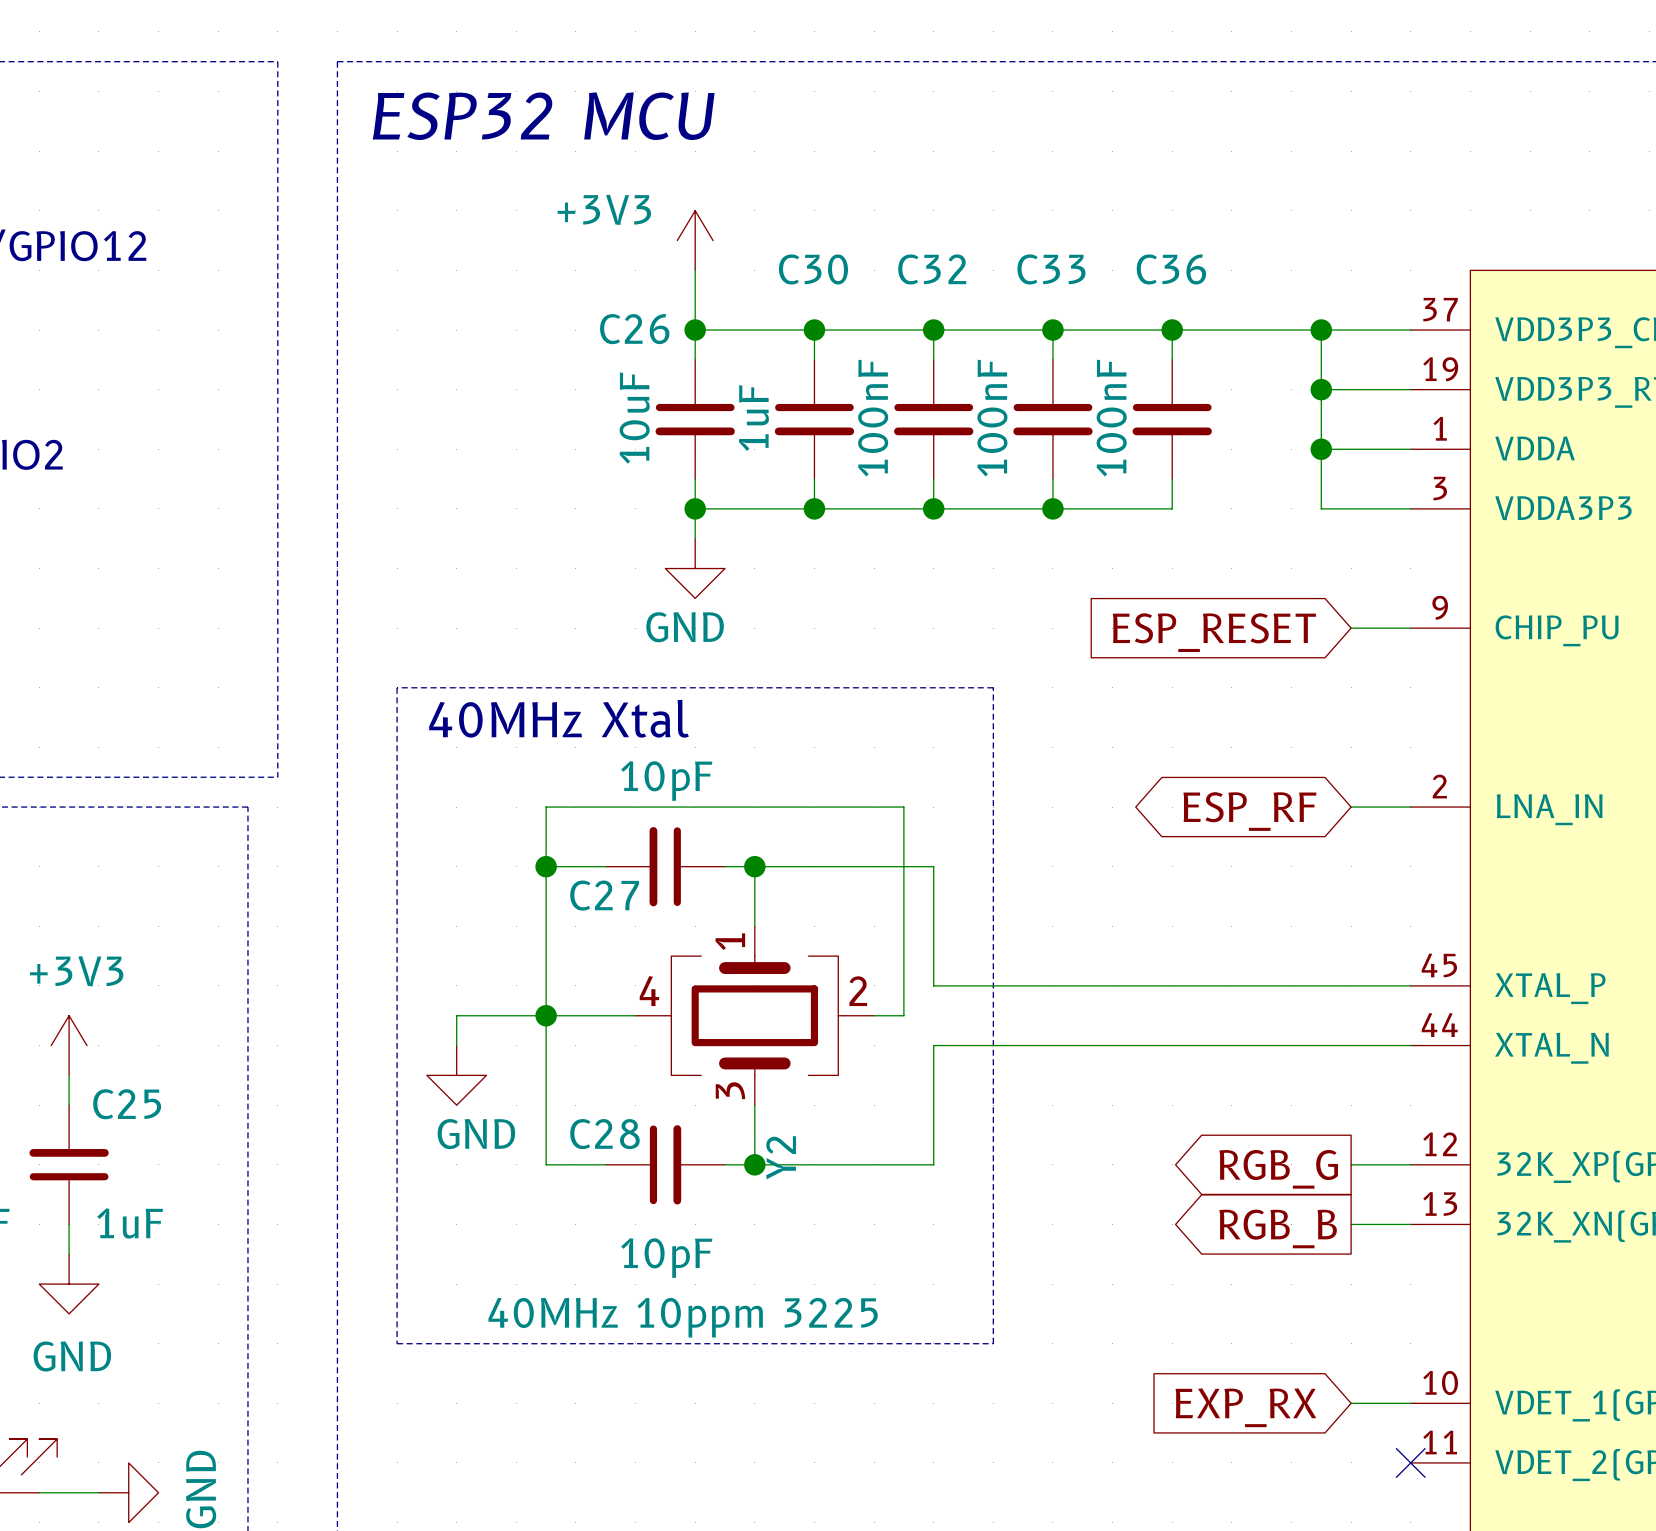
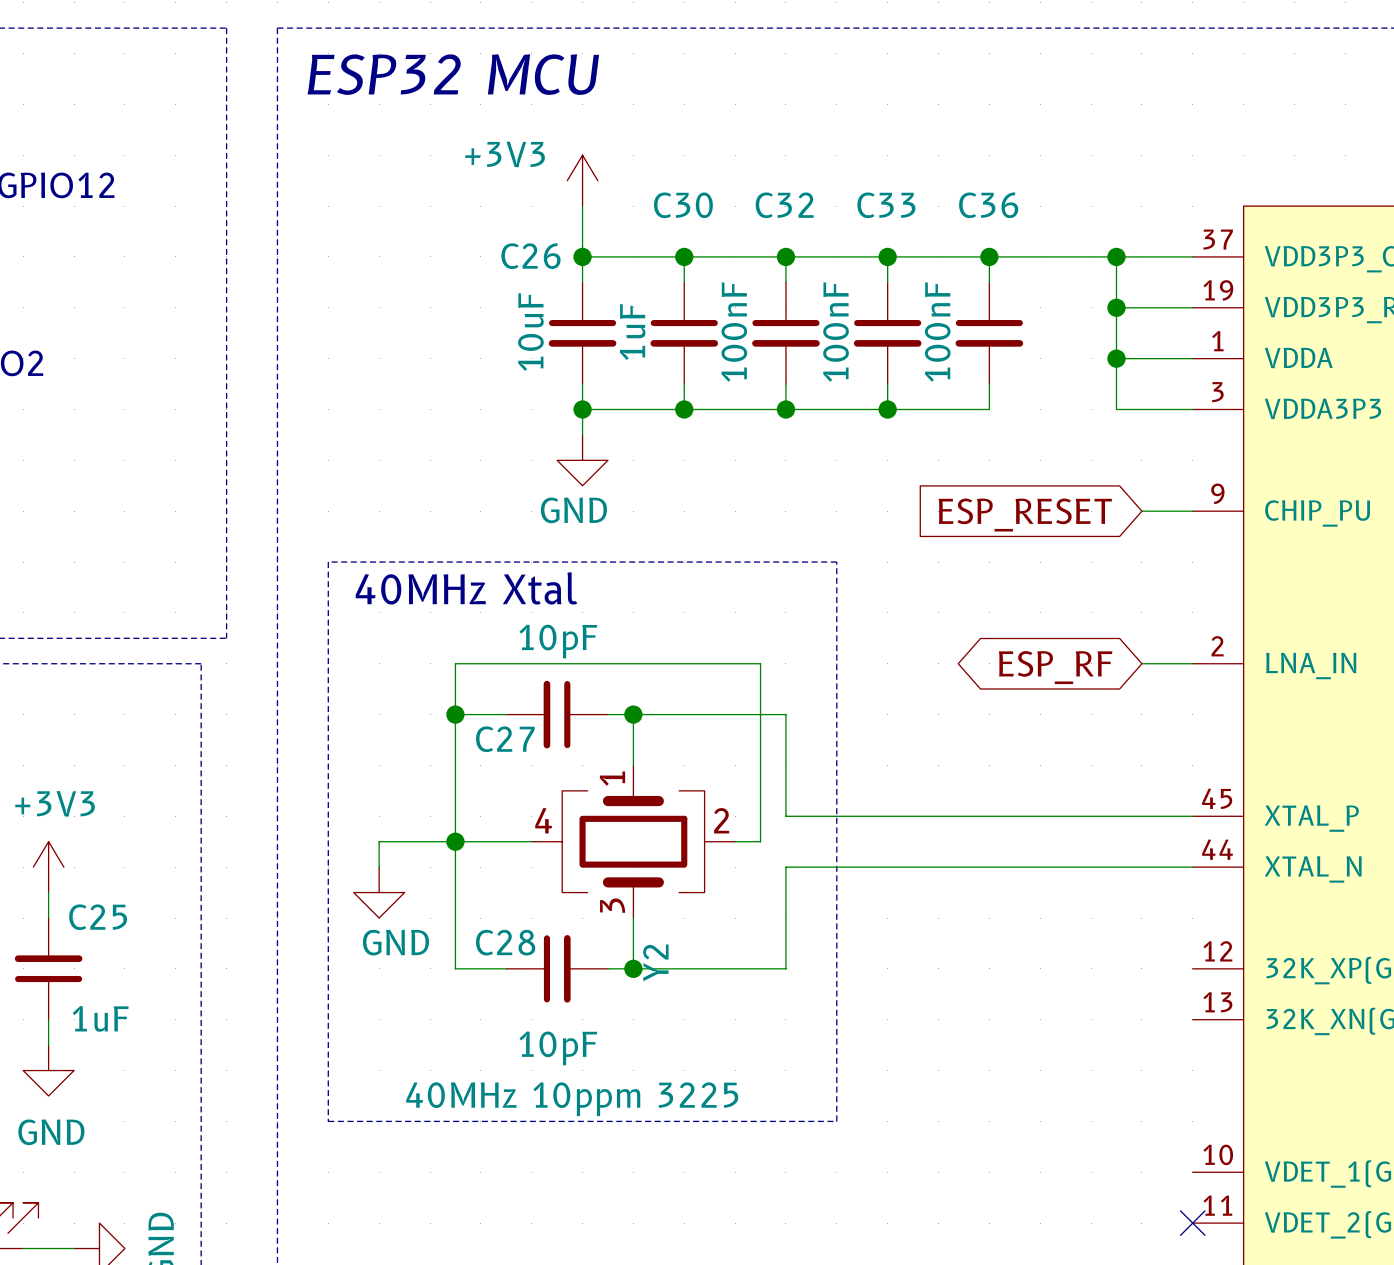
wire: (1351, 1164) (1410, 1164) -> none
global label: RGB_G (1278, 1169) -> none
wire: (1351, 1224) (1410, 1224) -> none
global label: RGB_B (1278, 1228) -> none
wire: (1351, 1403) (1410, 1403) -> none
global label: EXP_RX (1245, 1407) -> none

